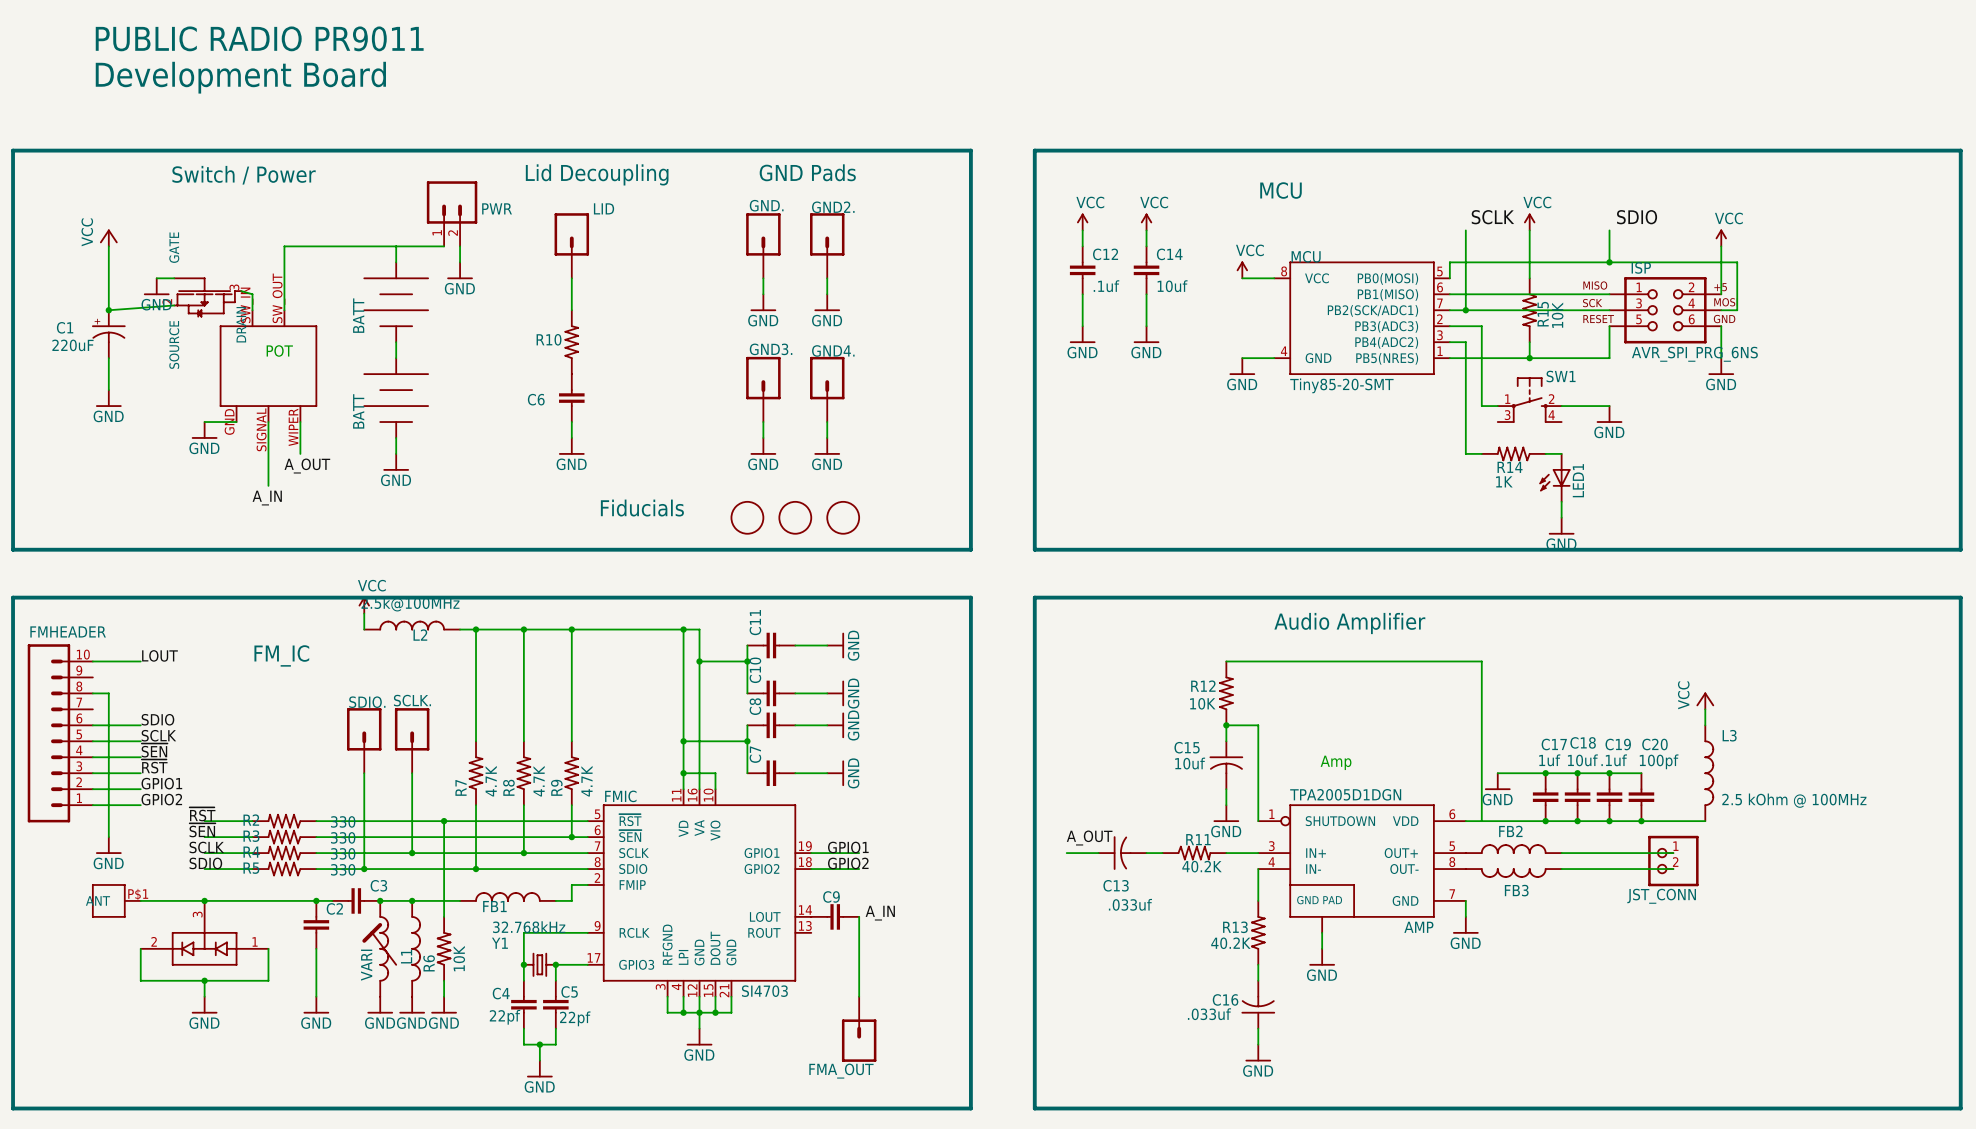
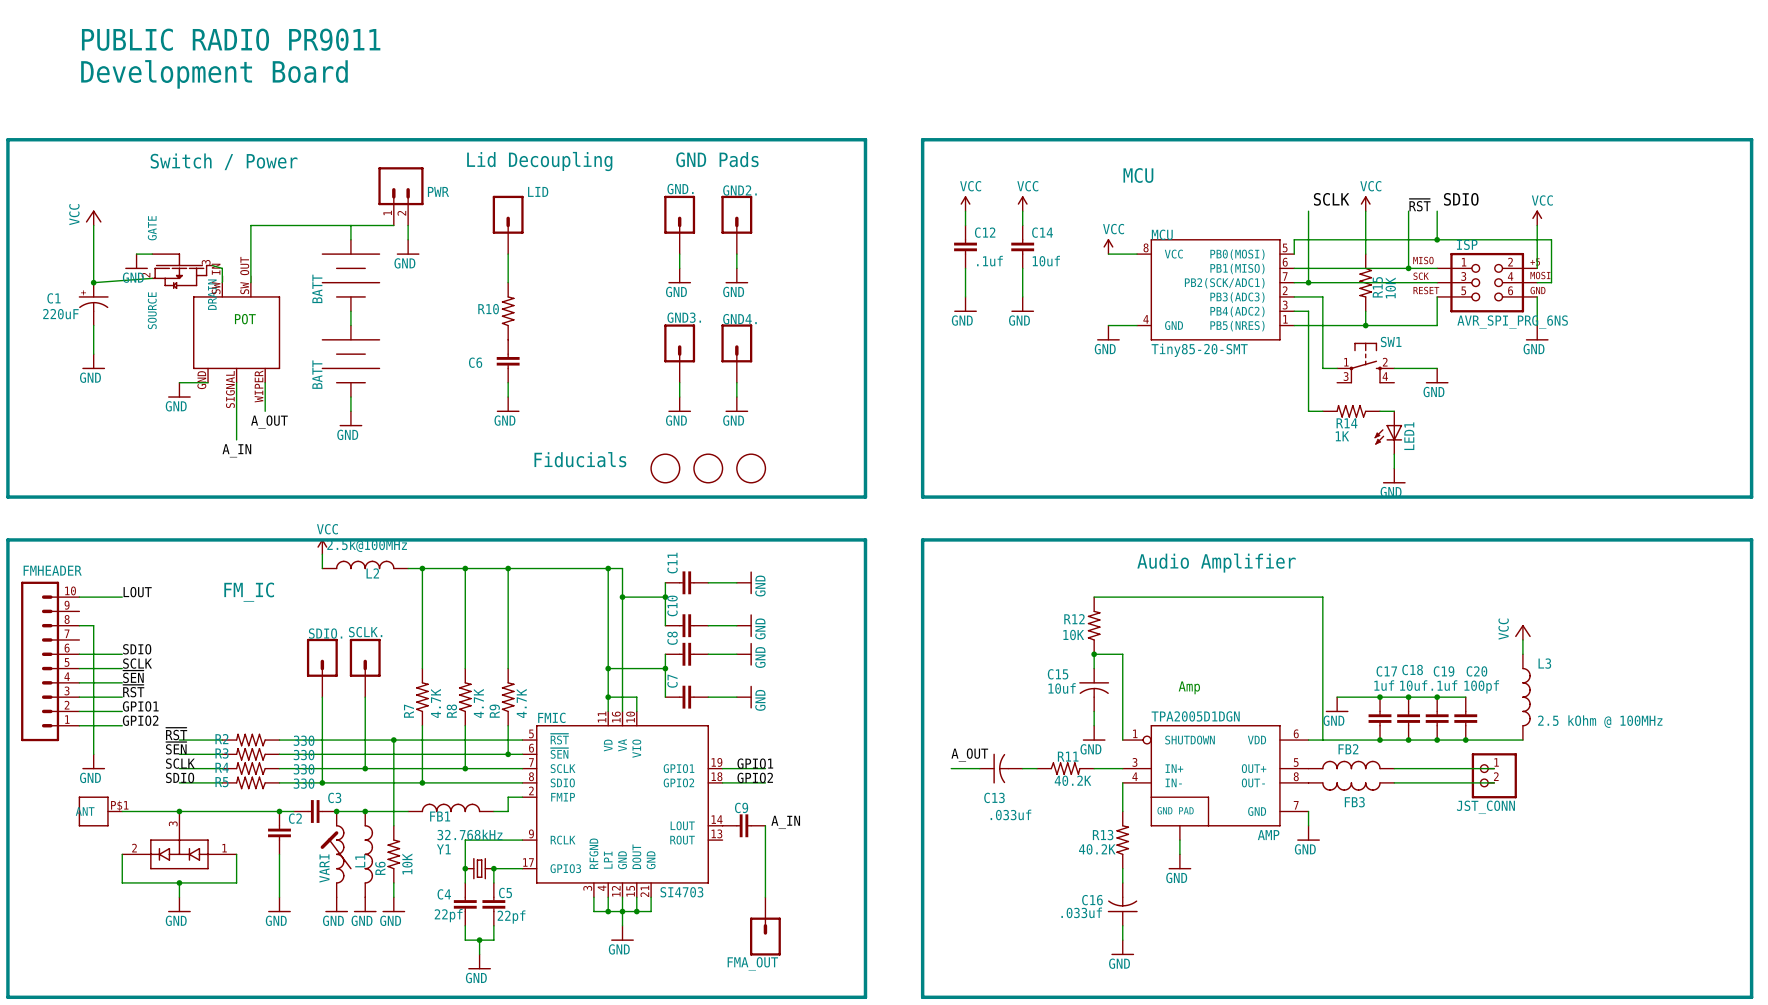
label: none -> ~{RST} (1420, 205)
wire: none -> (1408, 211) (1408, 268)
junction: none -> (1408, 268)

